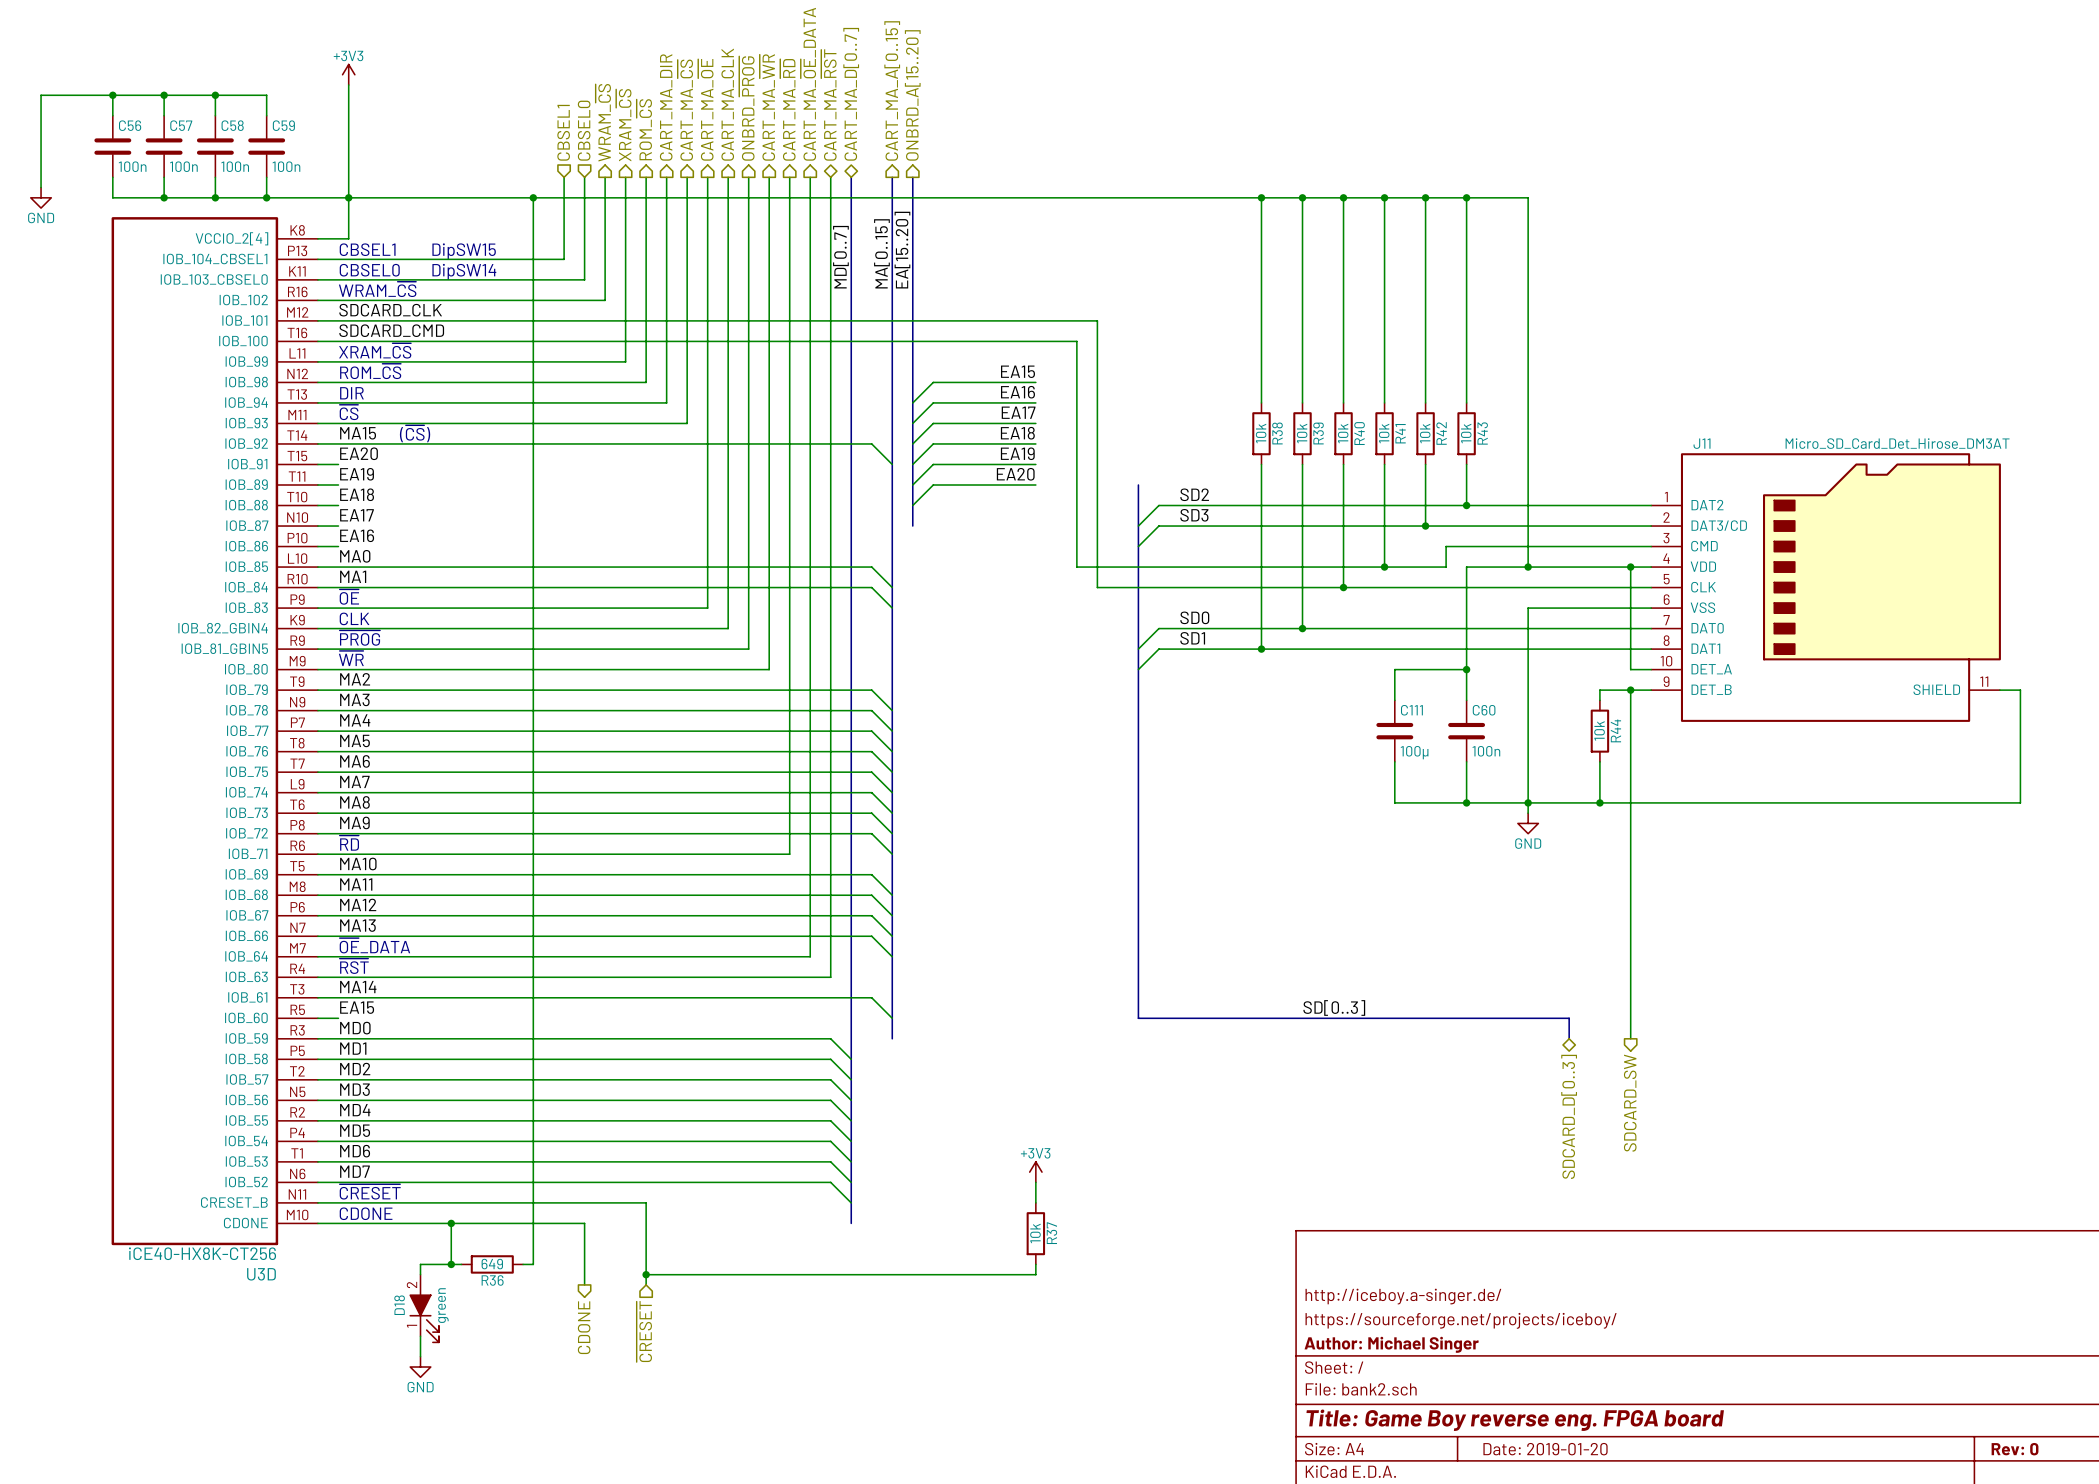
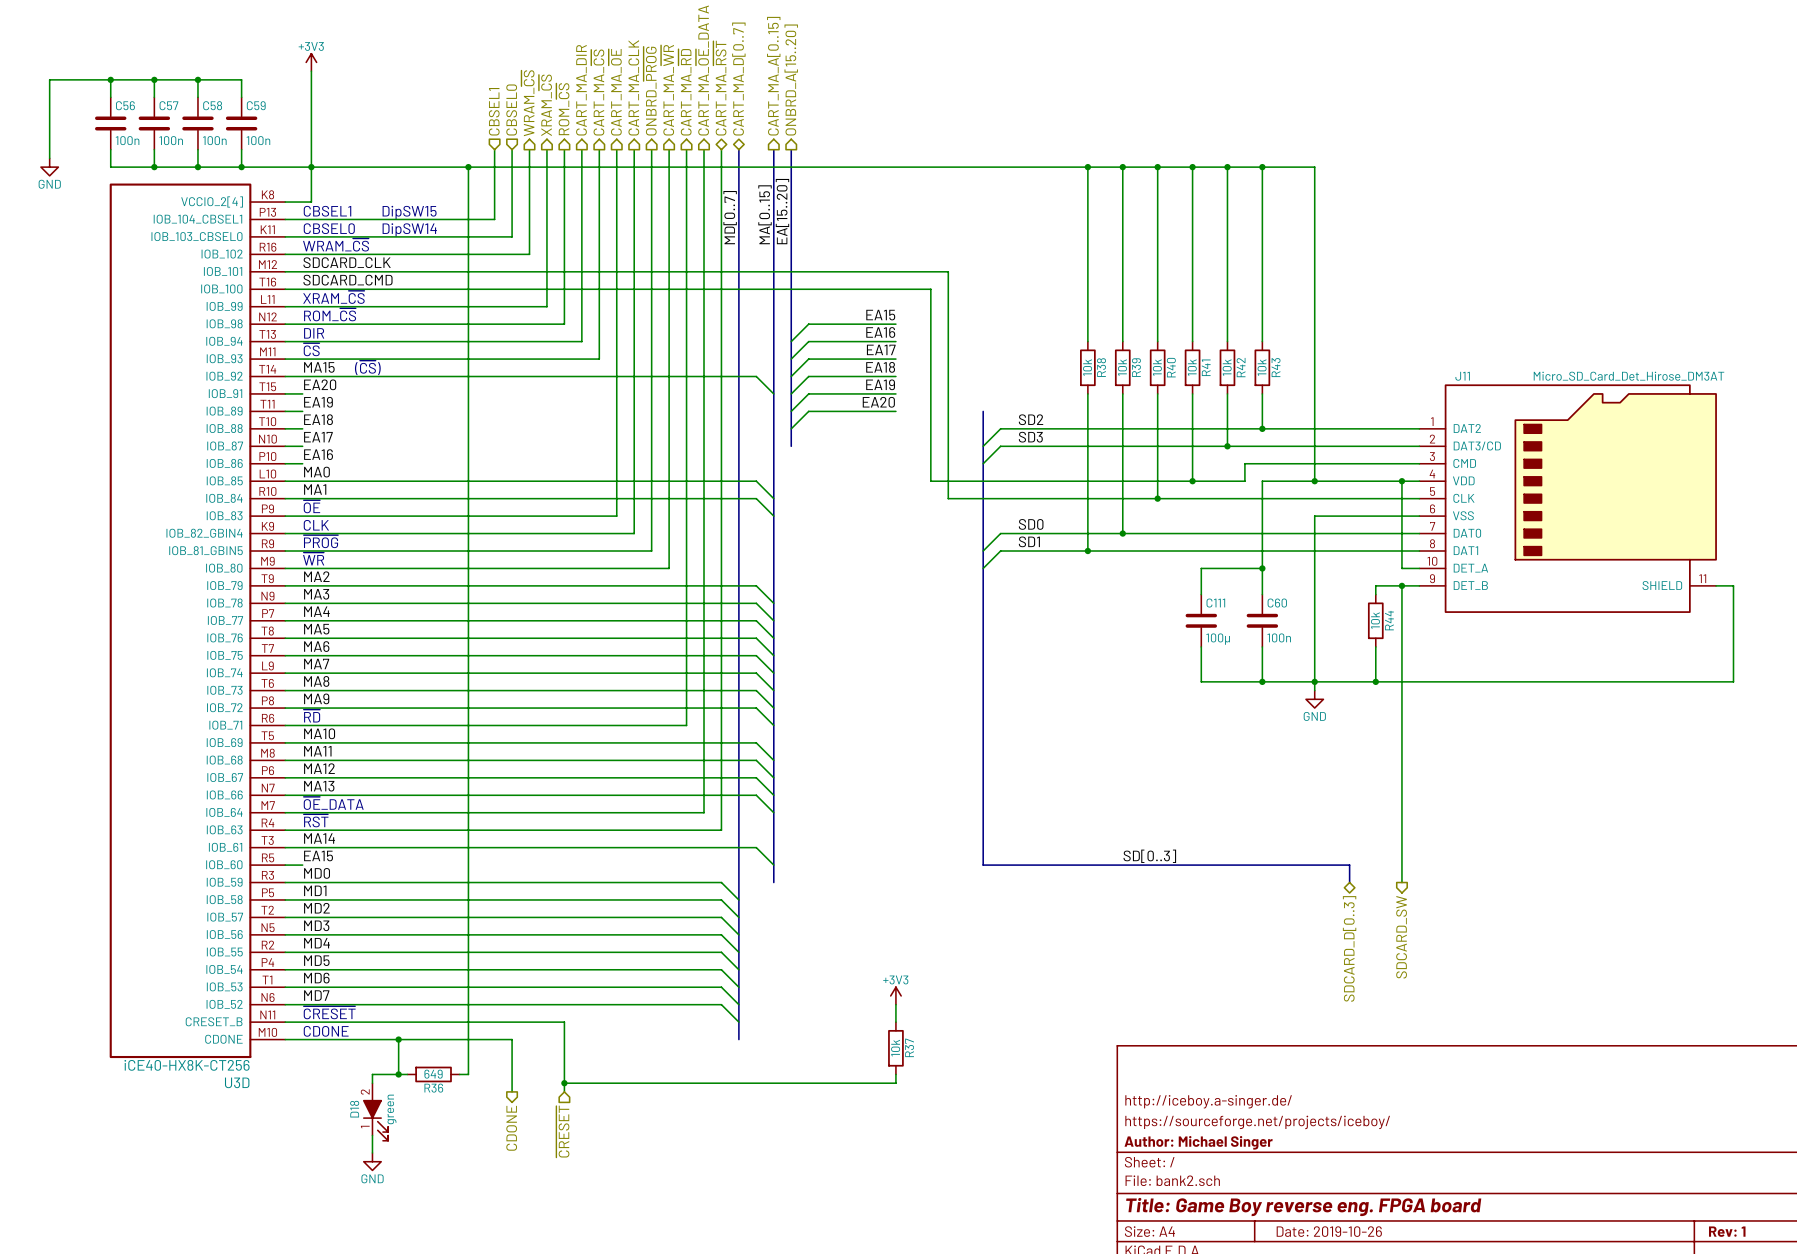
title block: Date: 2019-01-20 (1545, 1449) -> Date: 2019-10-26 (1329, 1231)
title block: Rev: 0 (2015, 1449) -> Rev: 1 (1727, 1231)

